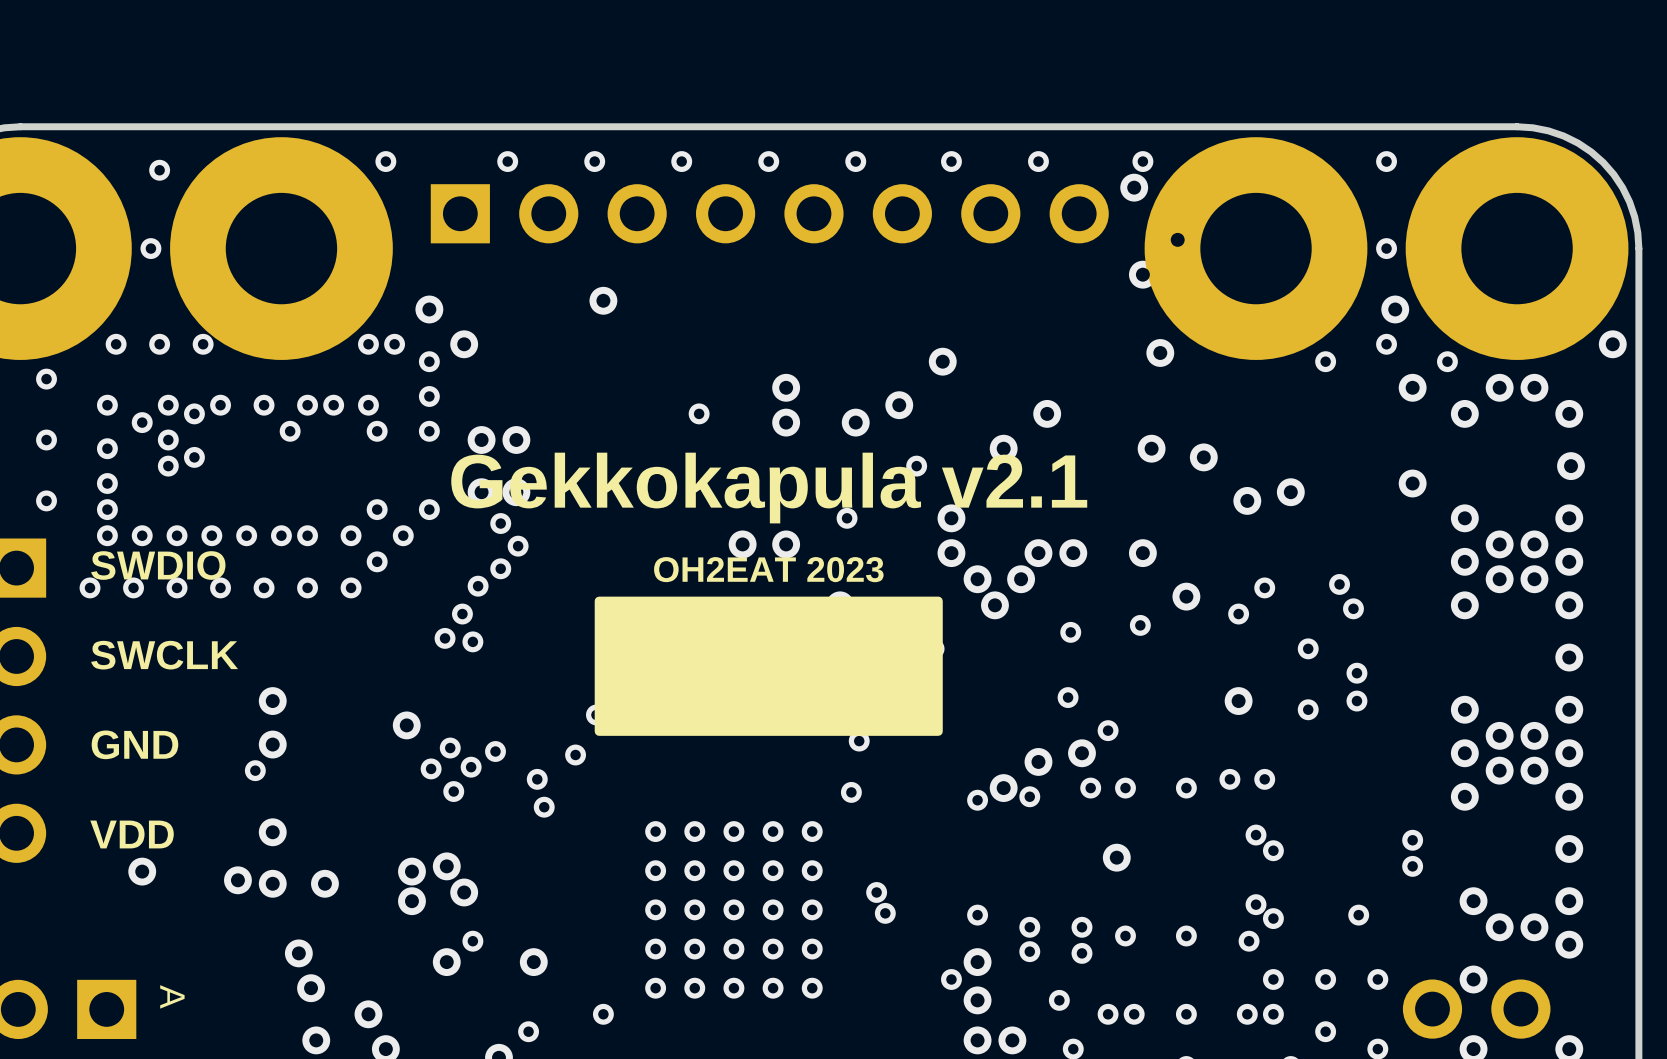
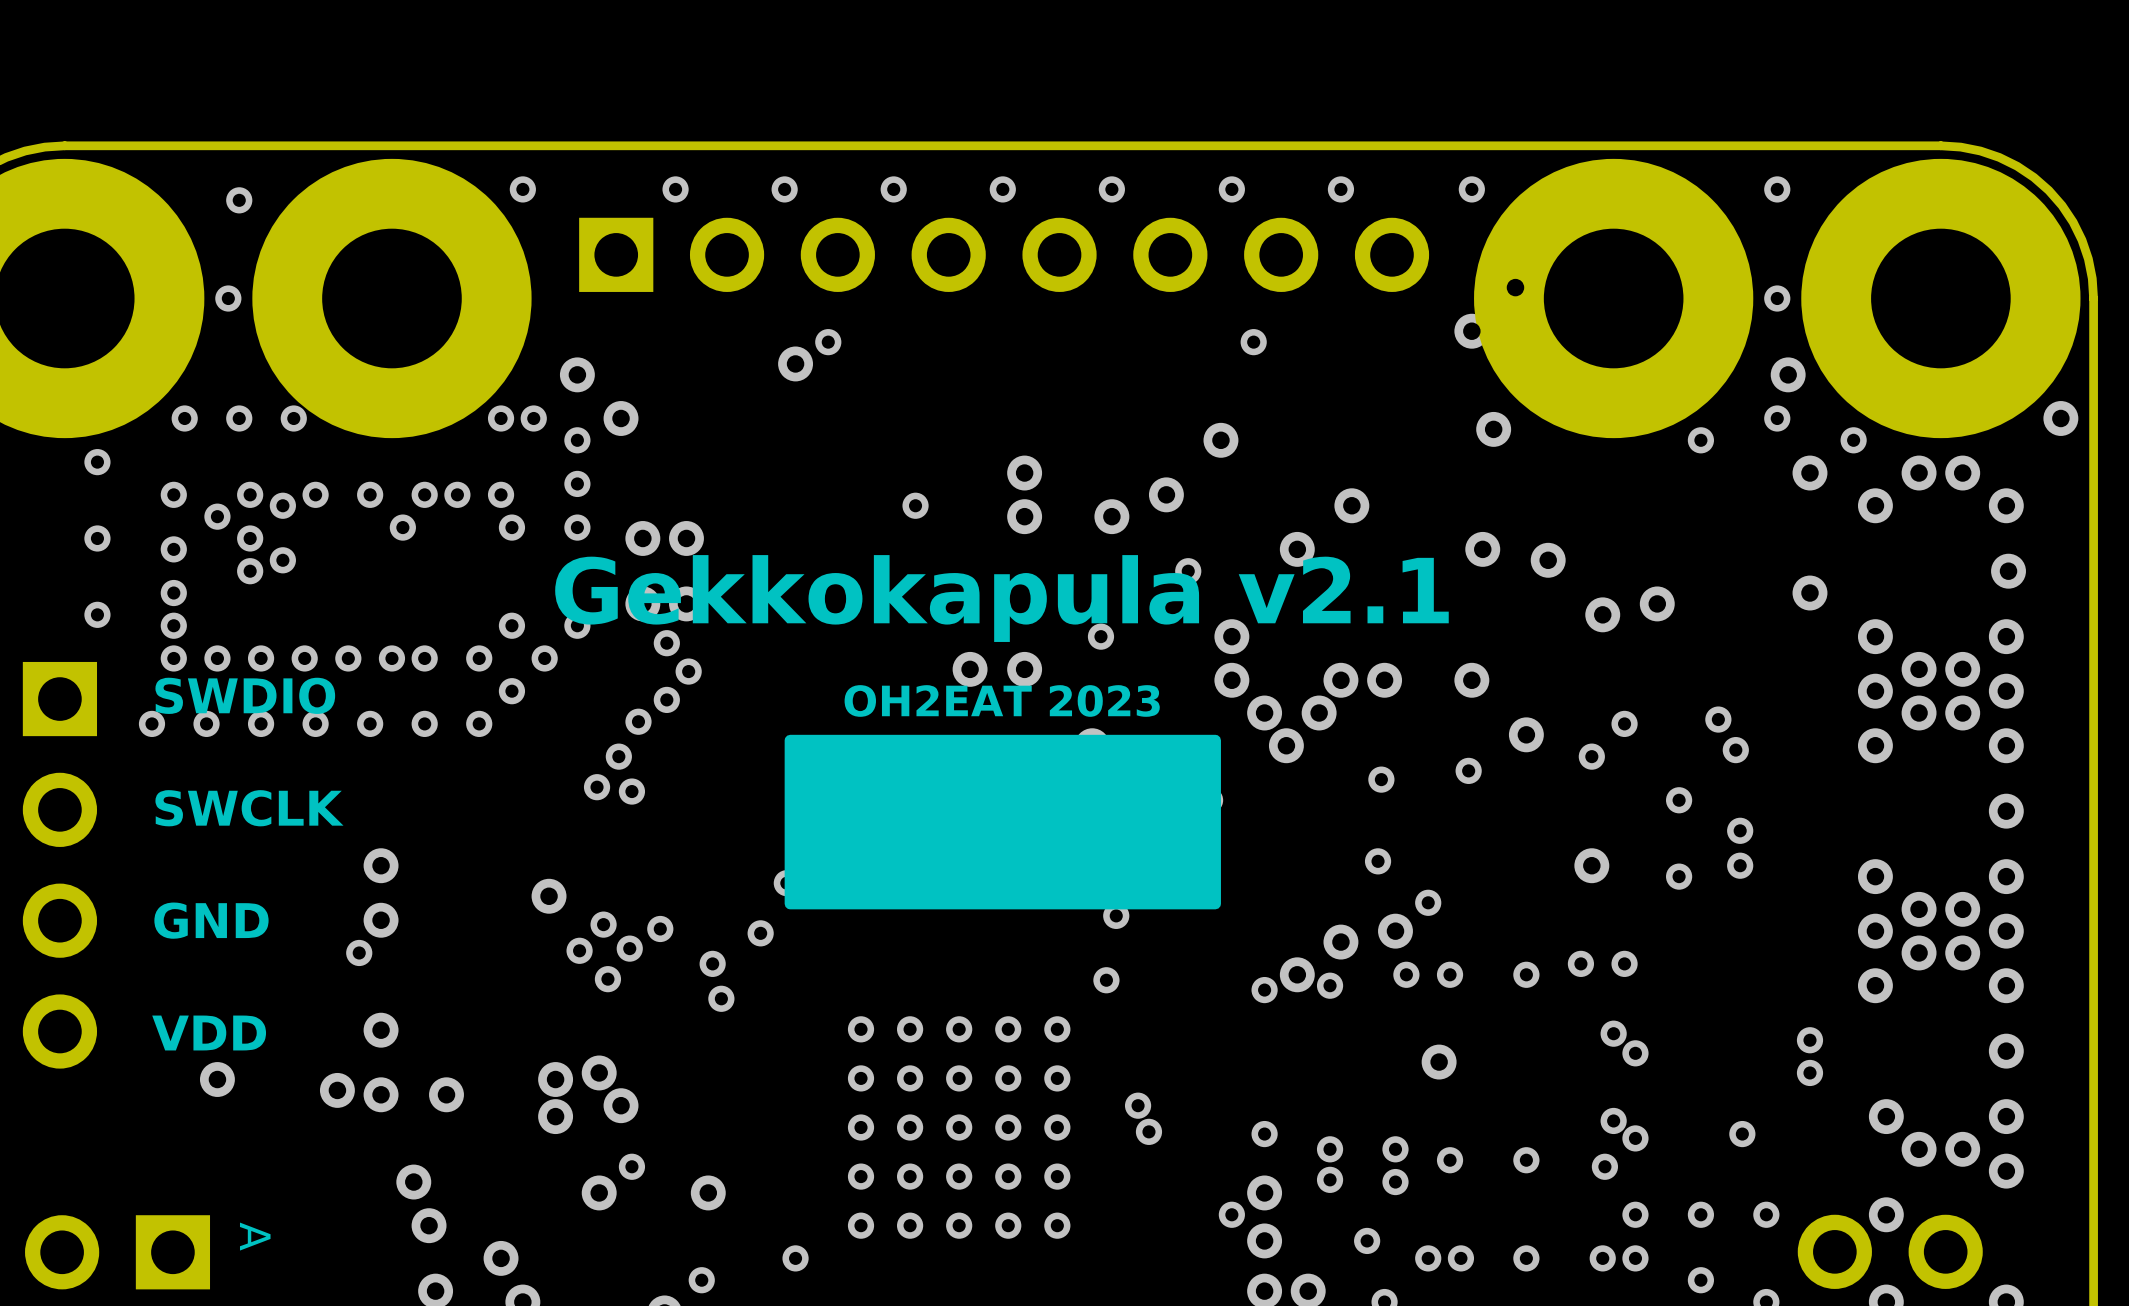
via: (1134, 187) -> none
via: none -> (828, 342)
via: none -> (1253, 342)

